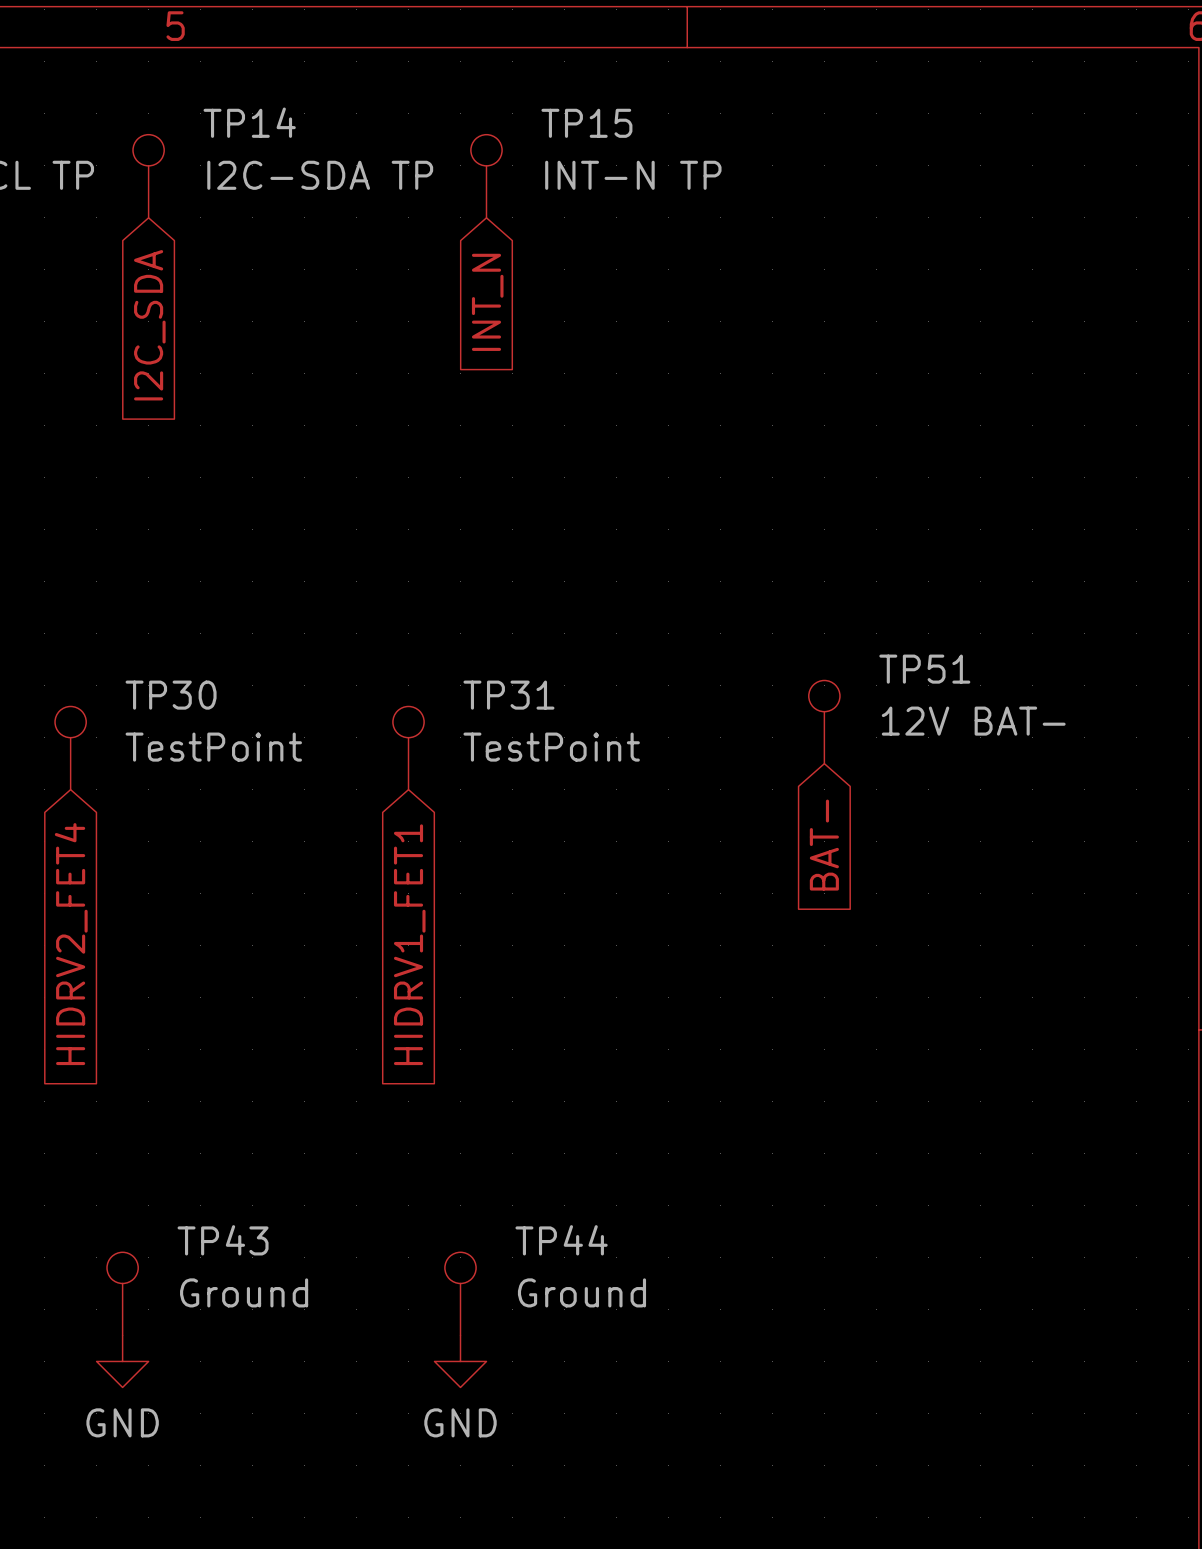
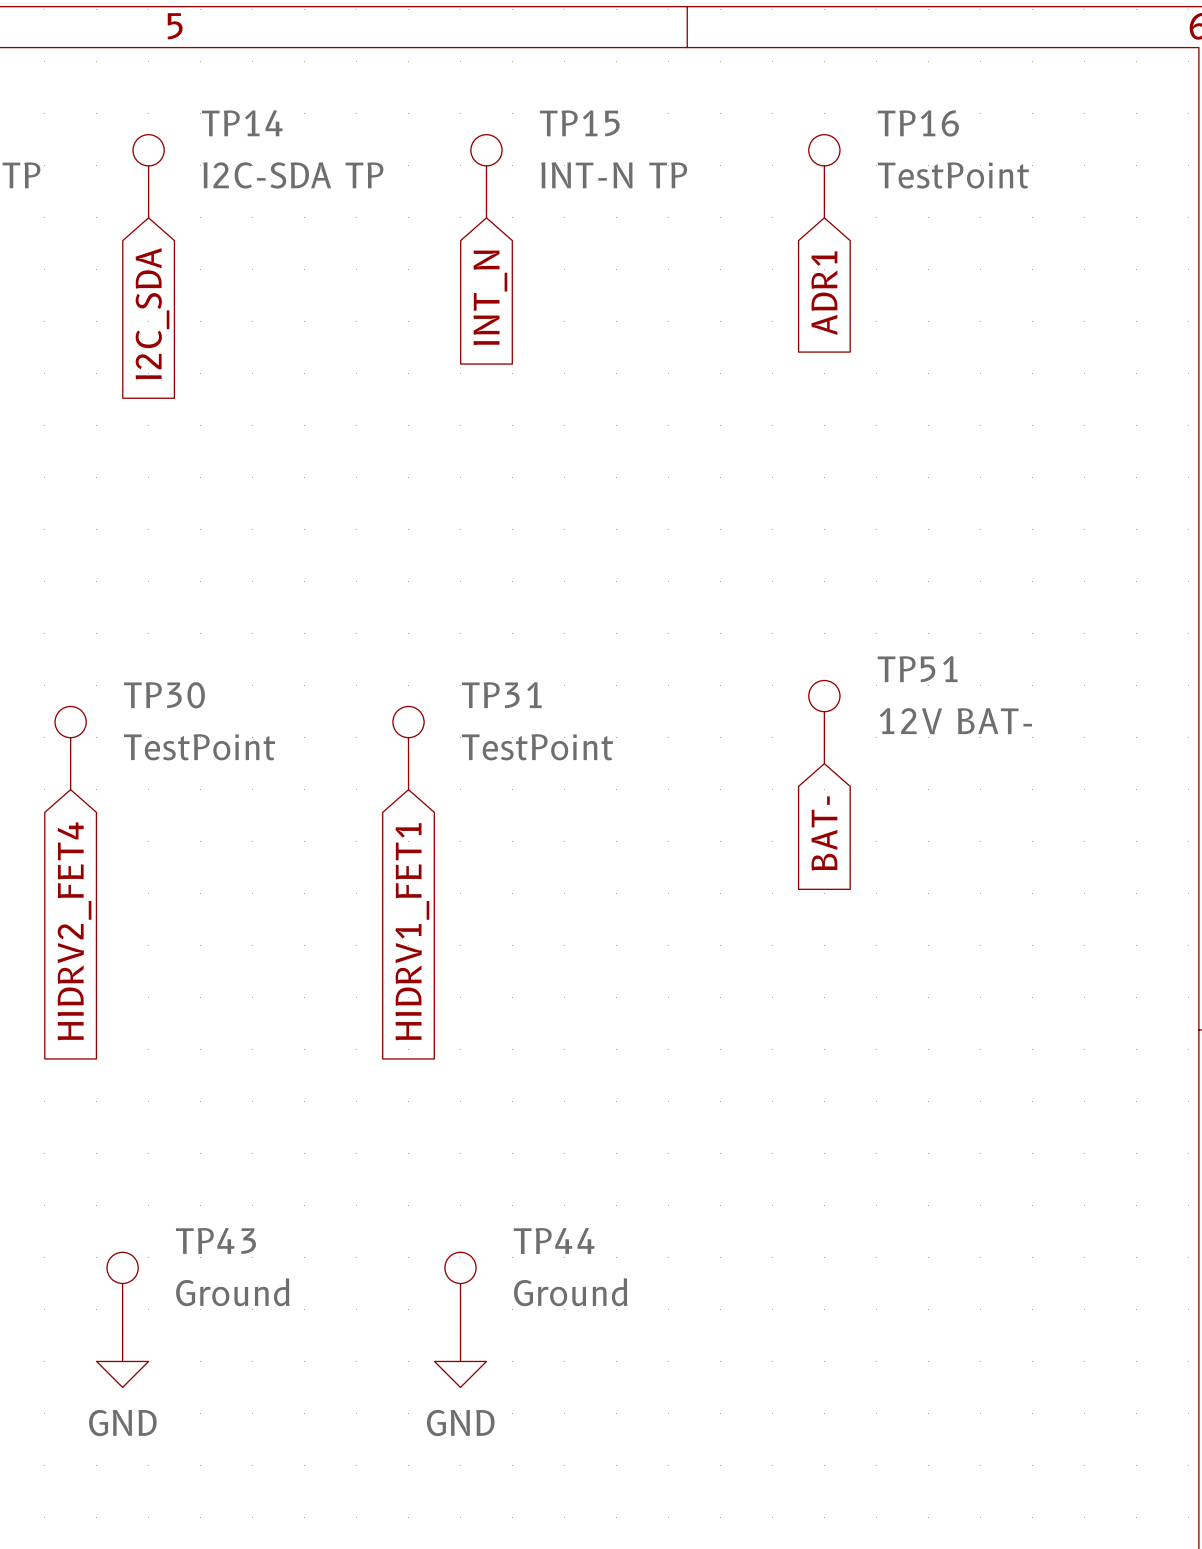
TP16: none -> TestPoint (824, 176)
global label: none -> ADR1 (824, 293)

